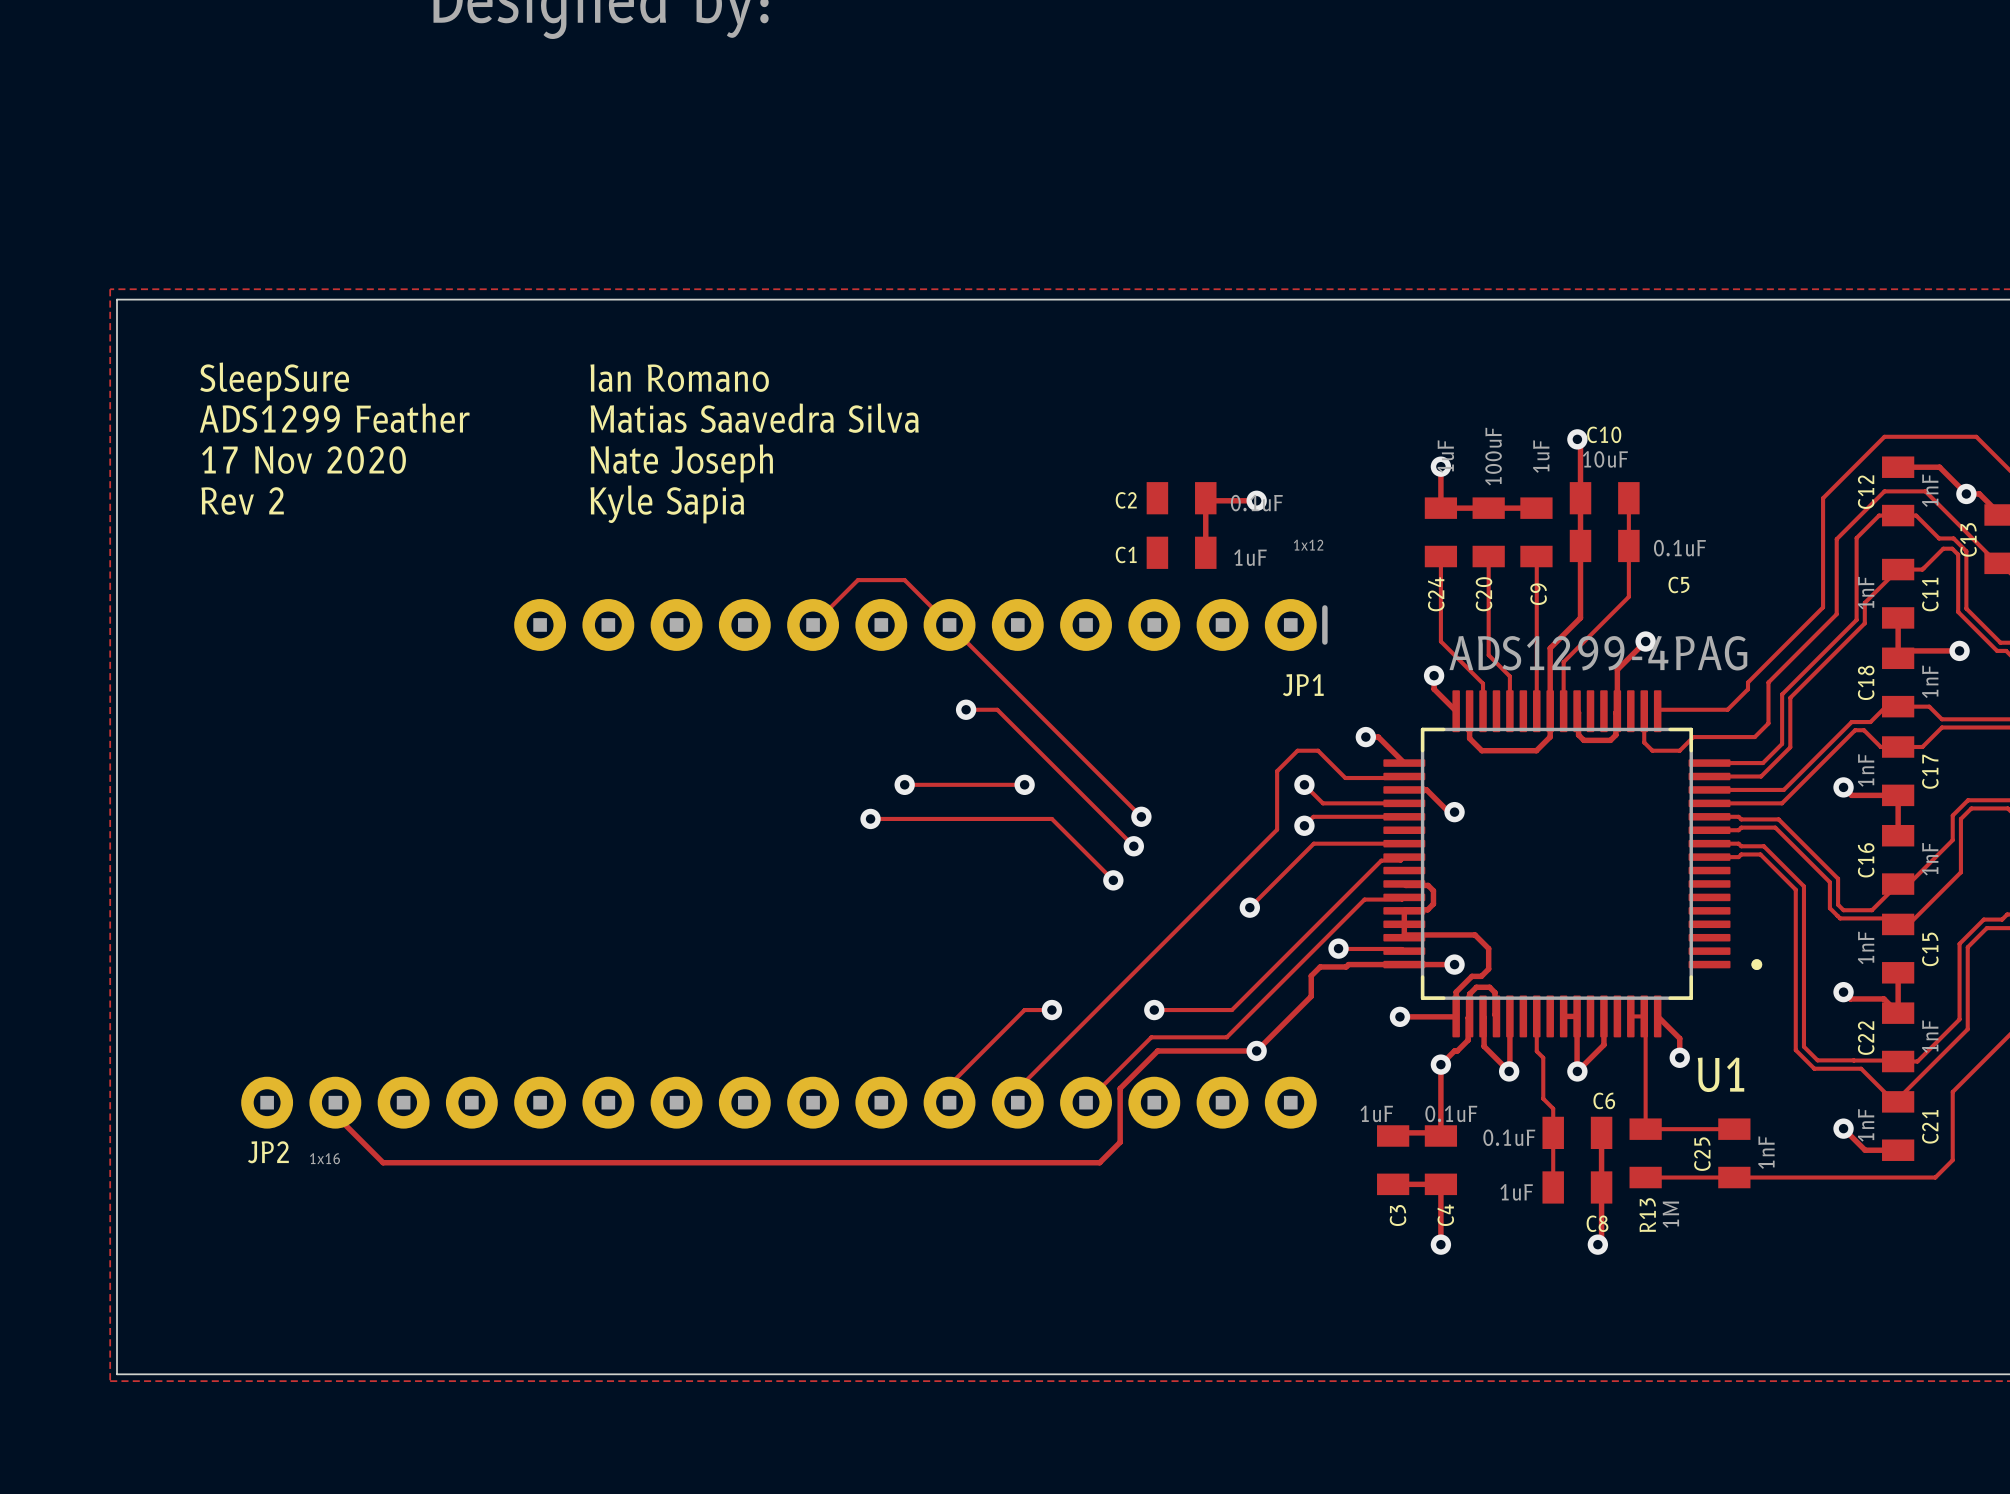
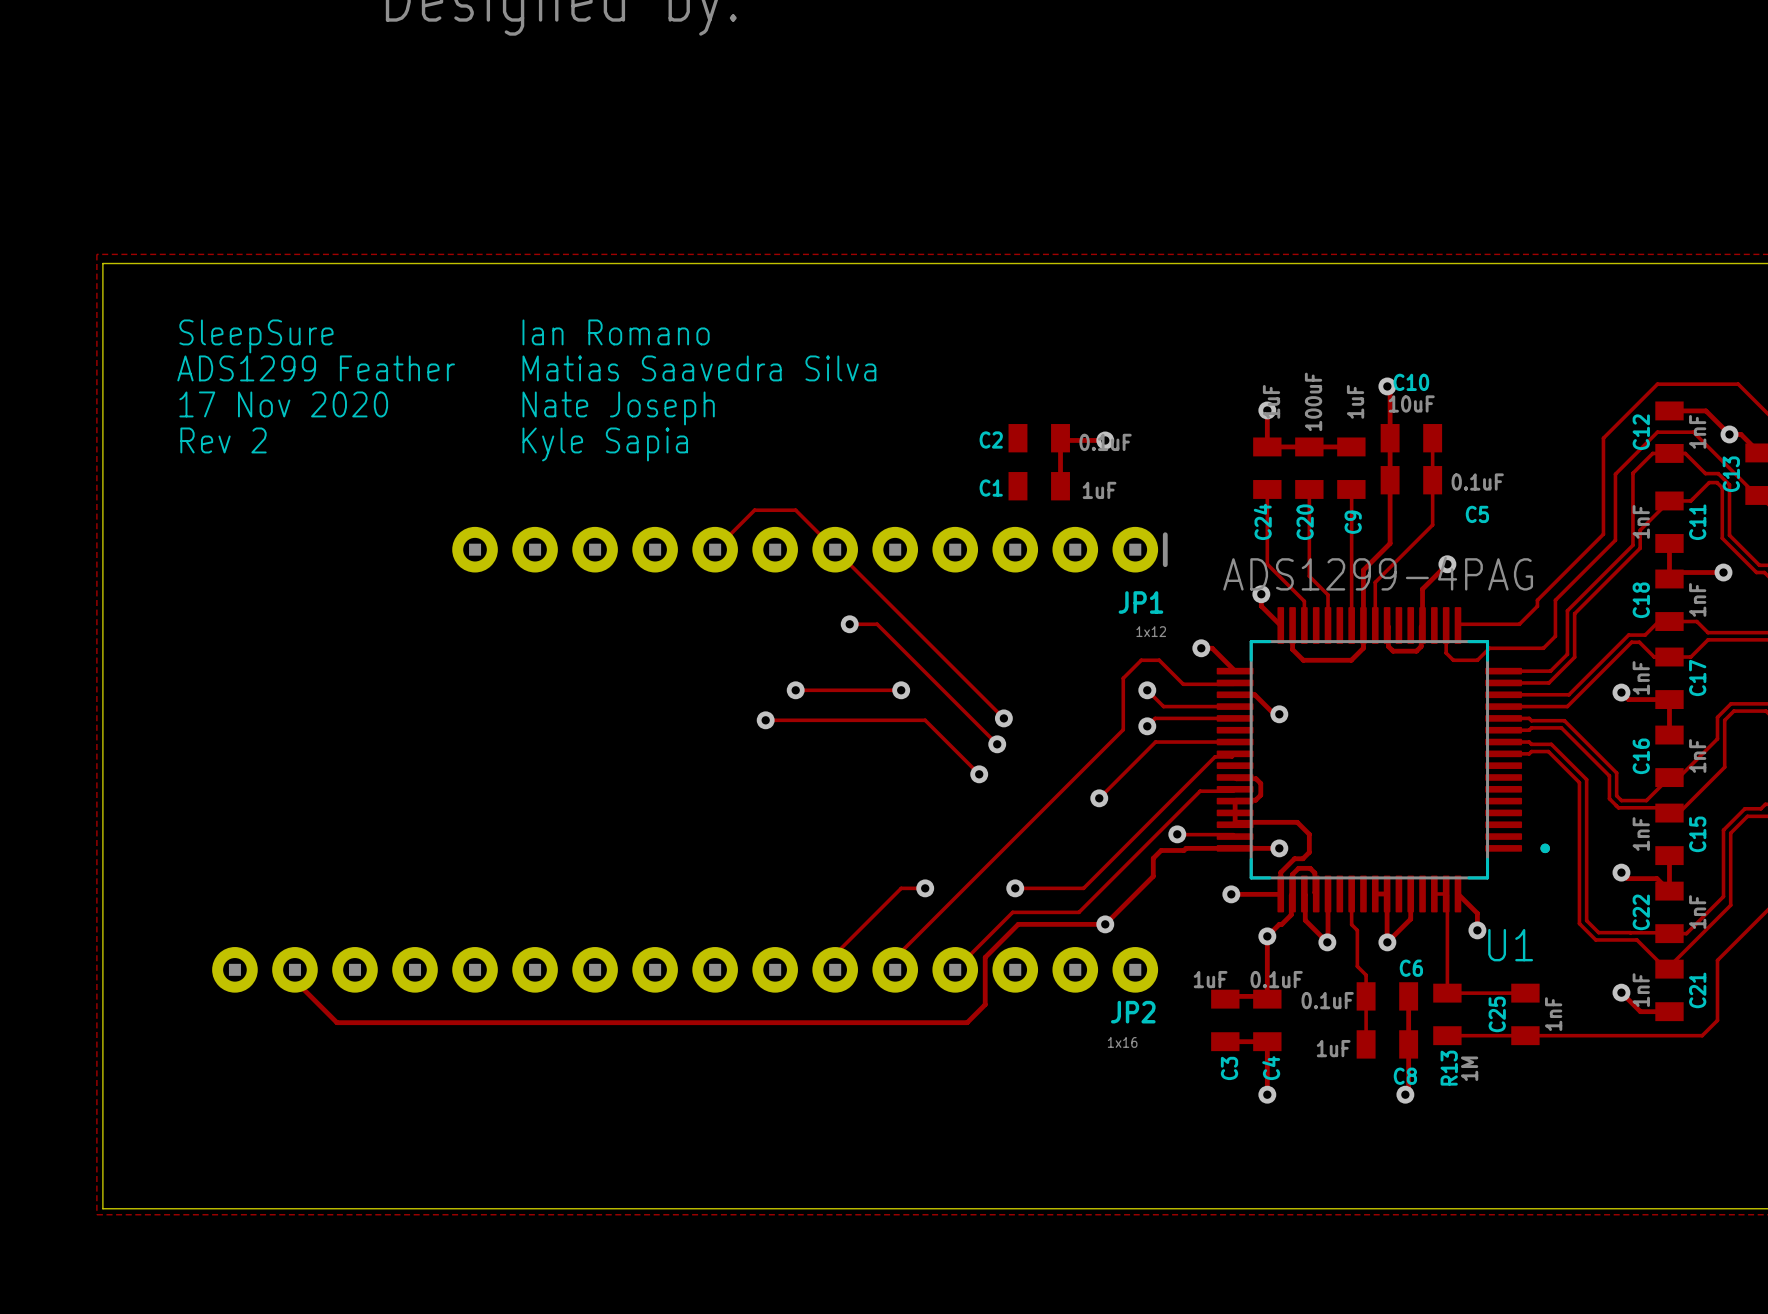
JP1 value position: 1x12 (1308, 545) -> 1x12 (1151, 631)
JP2 name position: JP2 (268, 1152) -> JP2 (1133, 1012)
JP2 value position: 1x16 (324, 1158) -> 1x16 (1122, 1042)

